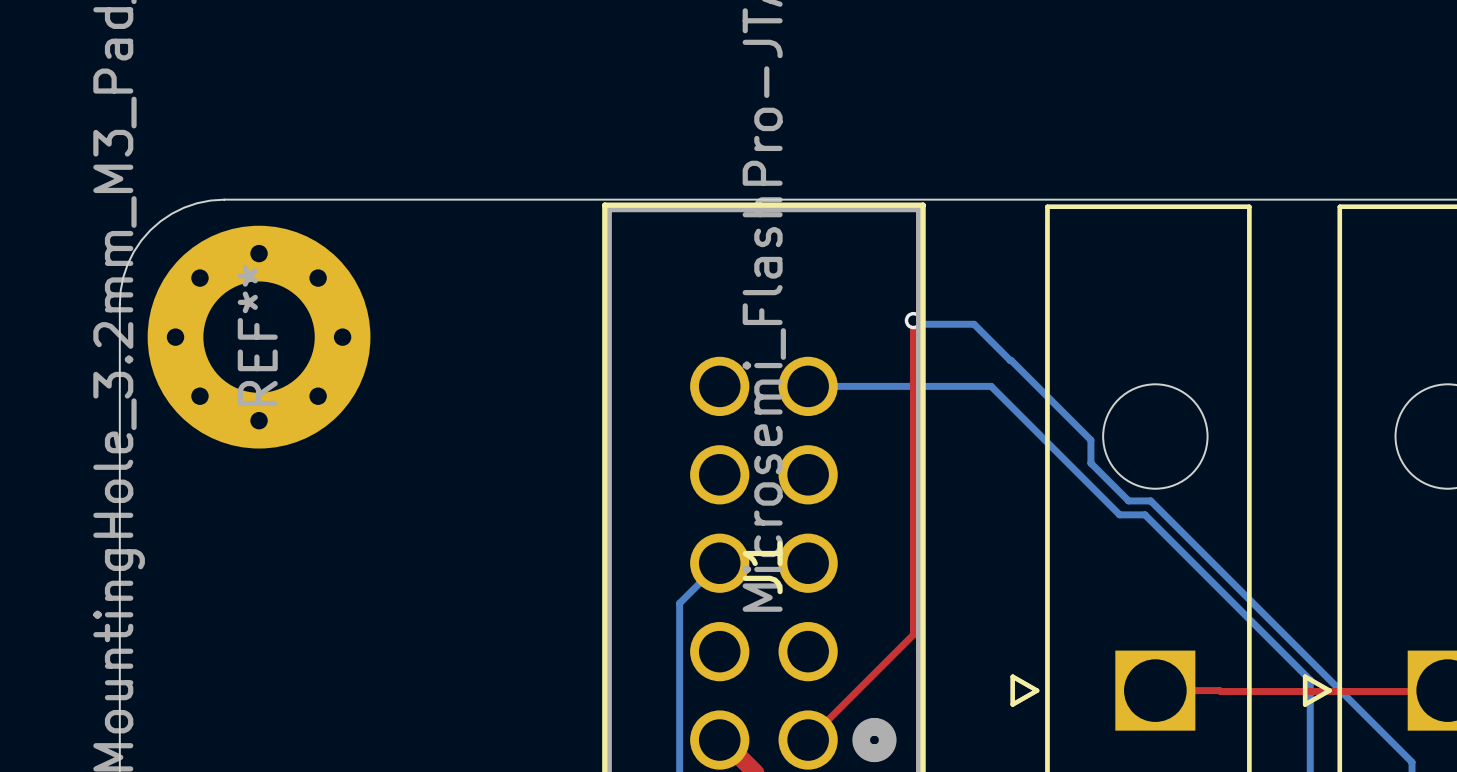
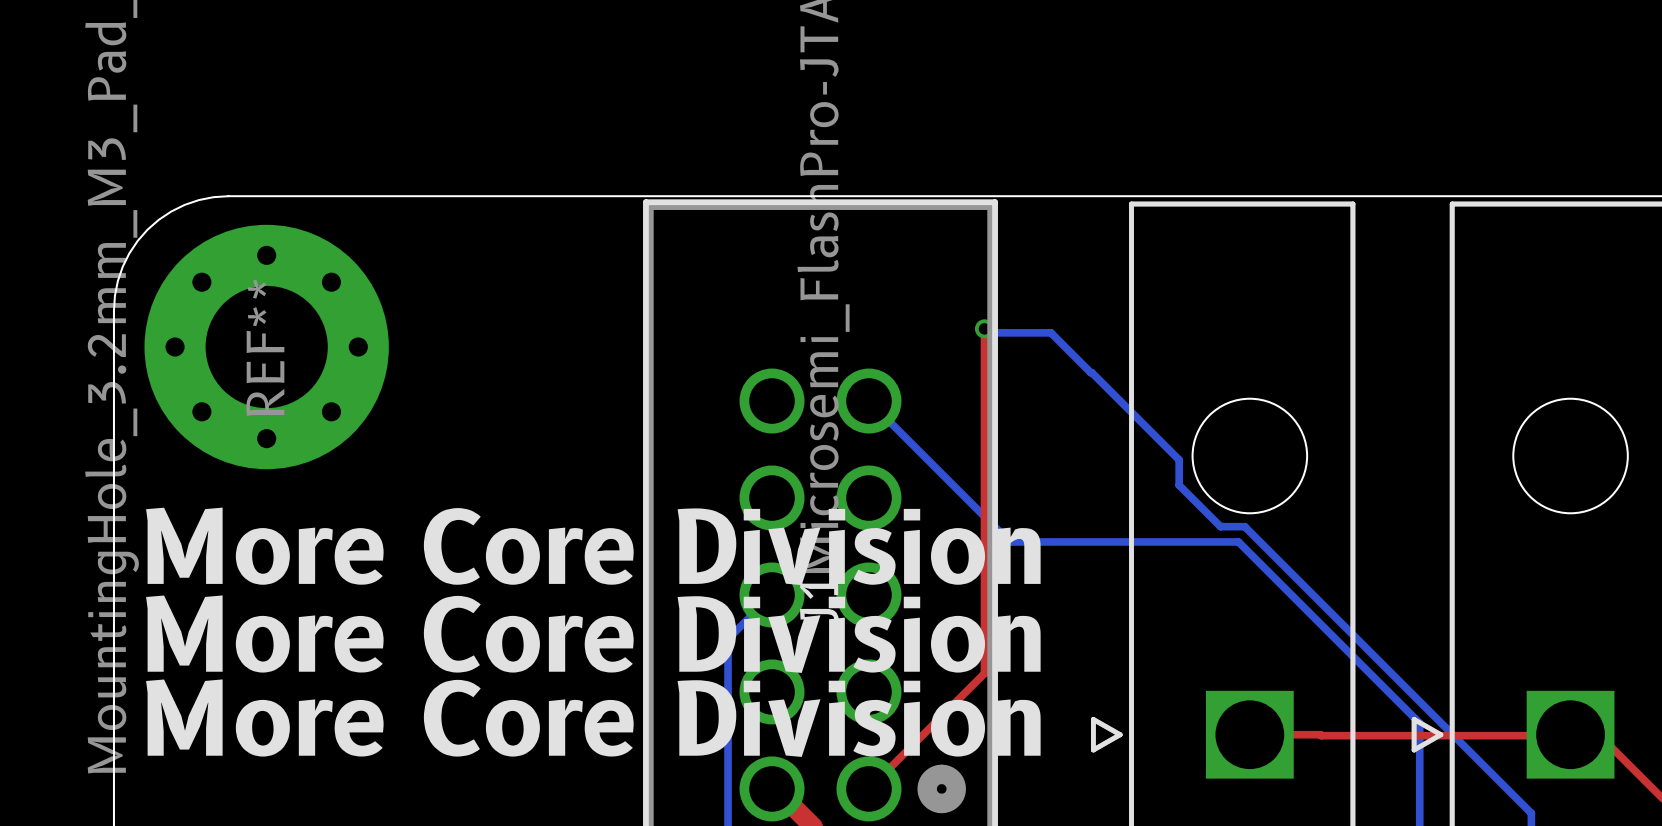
bottom track: (808, 386) (991, 386) (1119, 514) -> (868, 401) (1009, 541) (1210, 541)
text: none -> More Core Division (593, 546)
text: none -> More Core Division (593, 634)
text: none -> More Core Division (593, 718)

